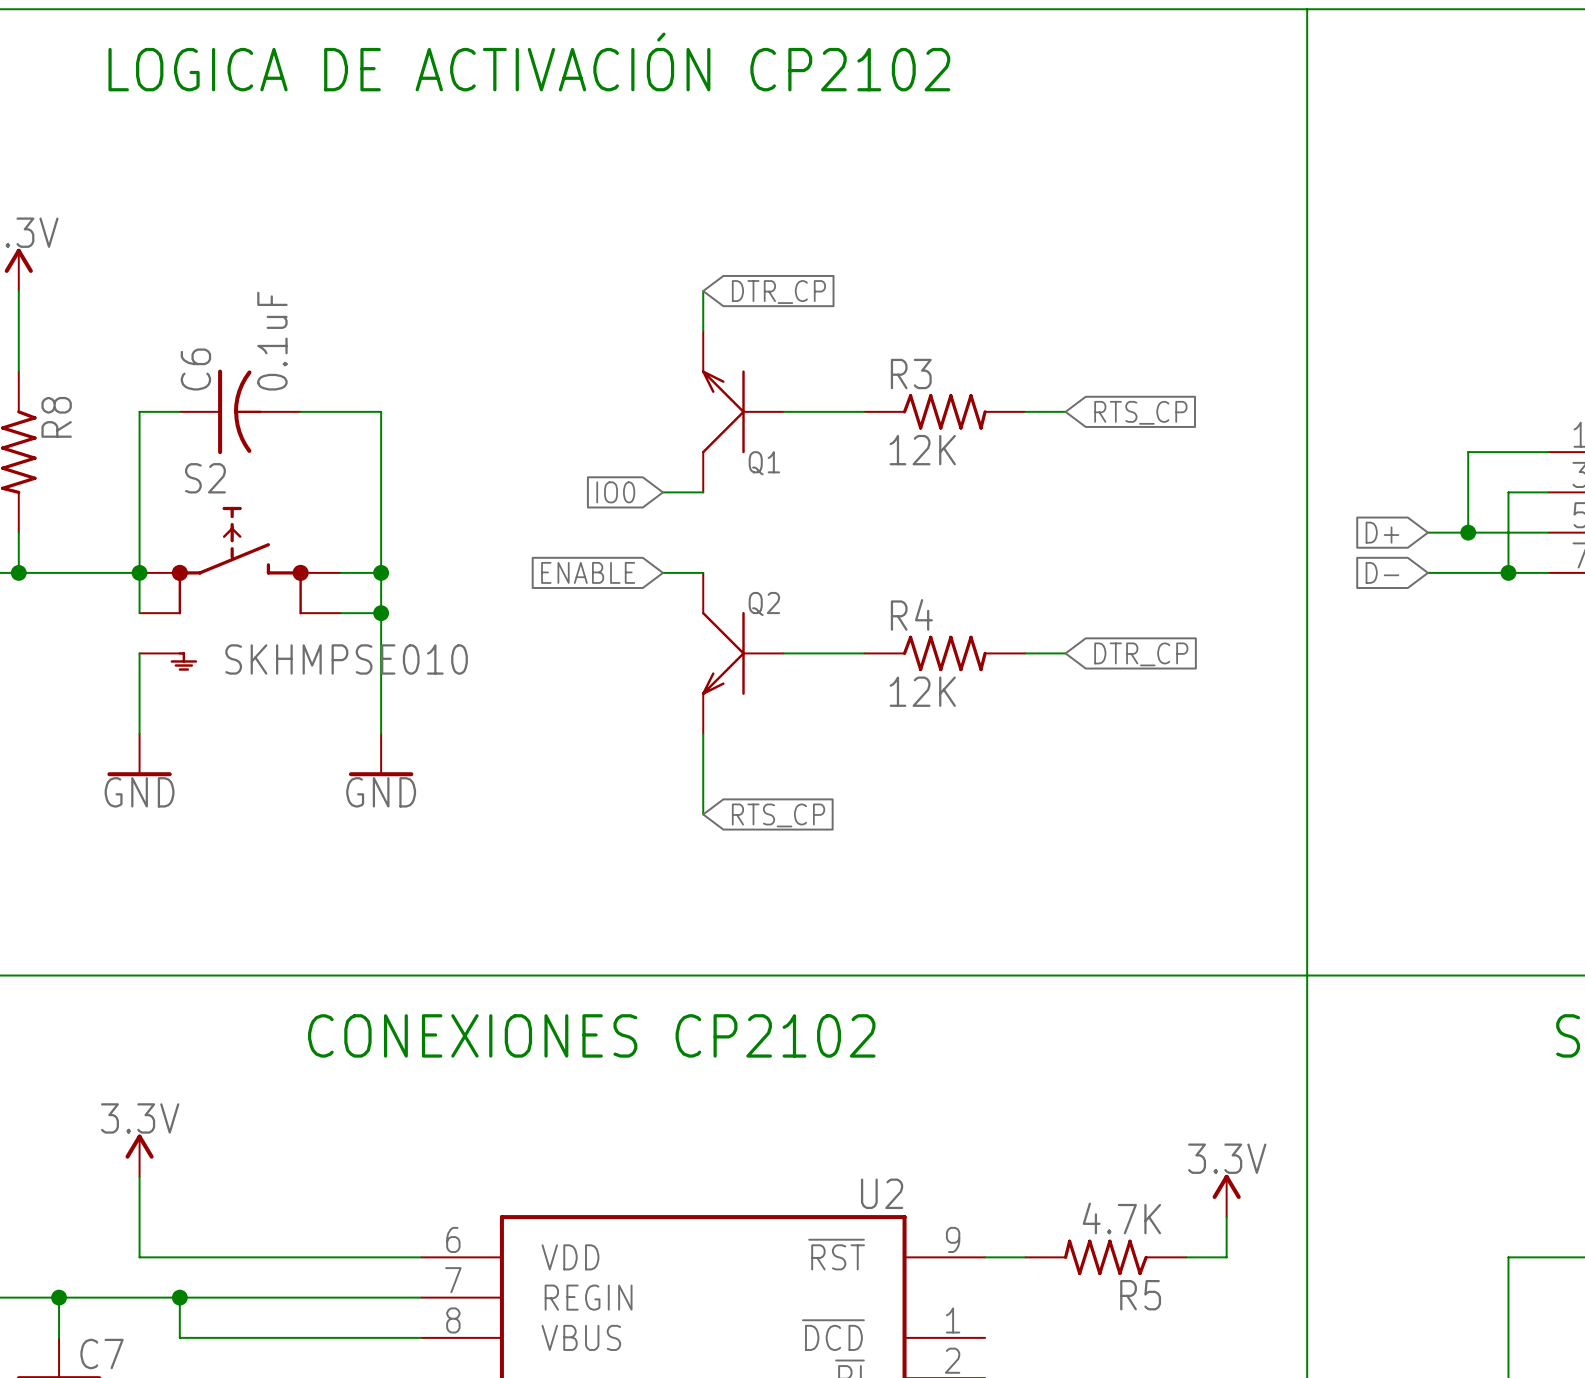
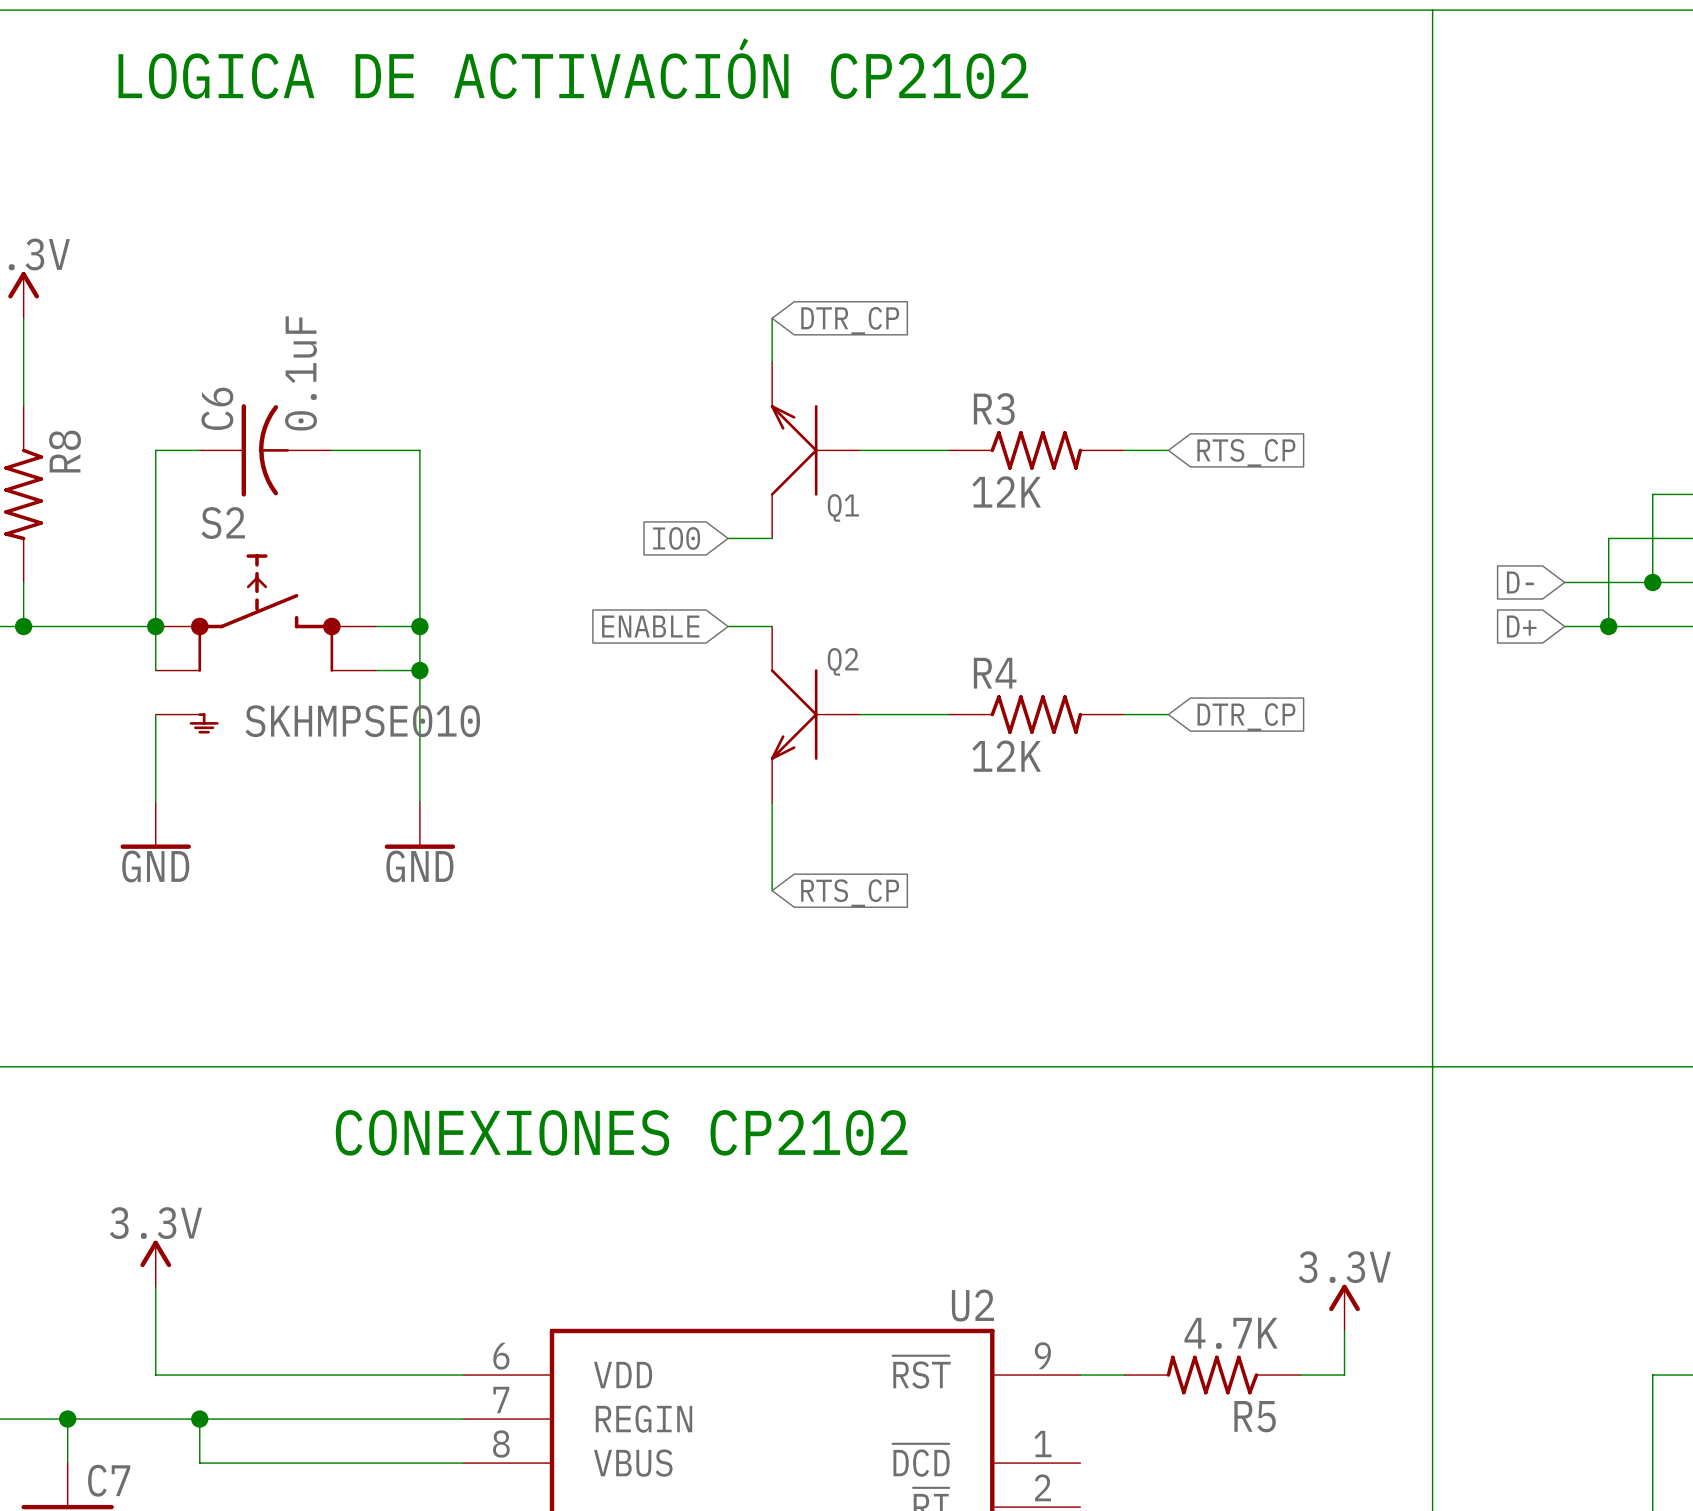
wire: (1508, 452) (1468, 452) (1468, 492) -> (1652, 494) (1652, 538) (1608, 538)
global label: D+ (1382, 532) -> D- (1520, 582)
junction: (1468, 532) -> none
wire: (1508, 532) (1508, 572) -> (1608, 582) (1608, 626)
junction: none -> (1652, 582)
global label: D- (1382, 572) -> D+ (1521, 626)
junction: none -> (1608, 626)
junction: (1508, 572) -> none

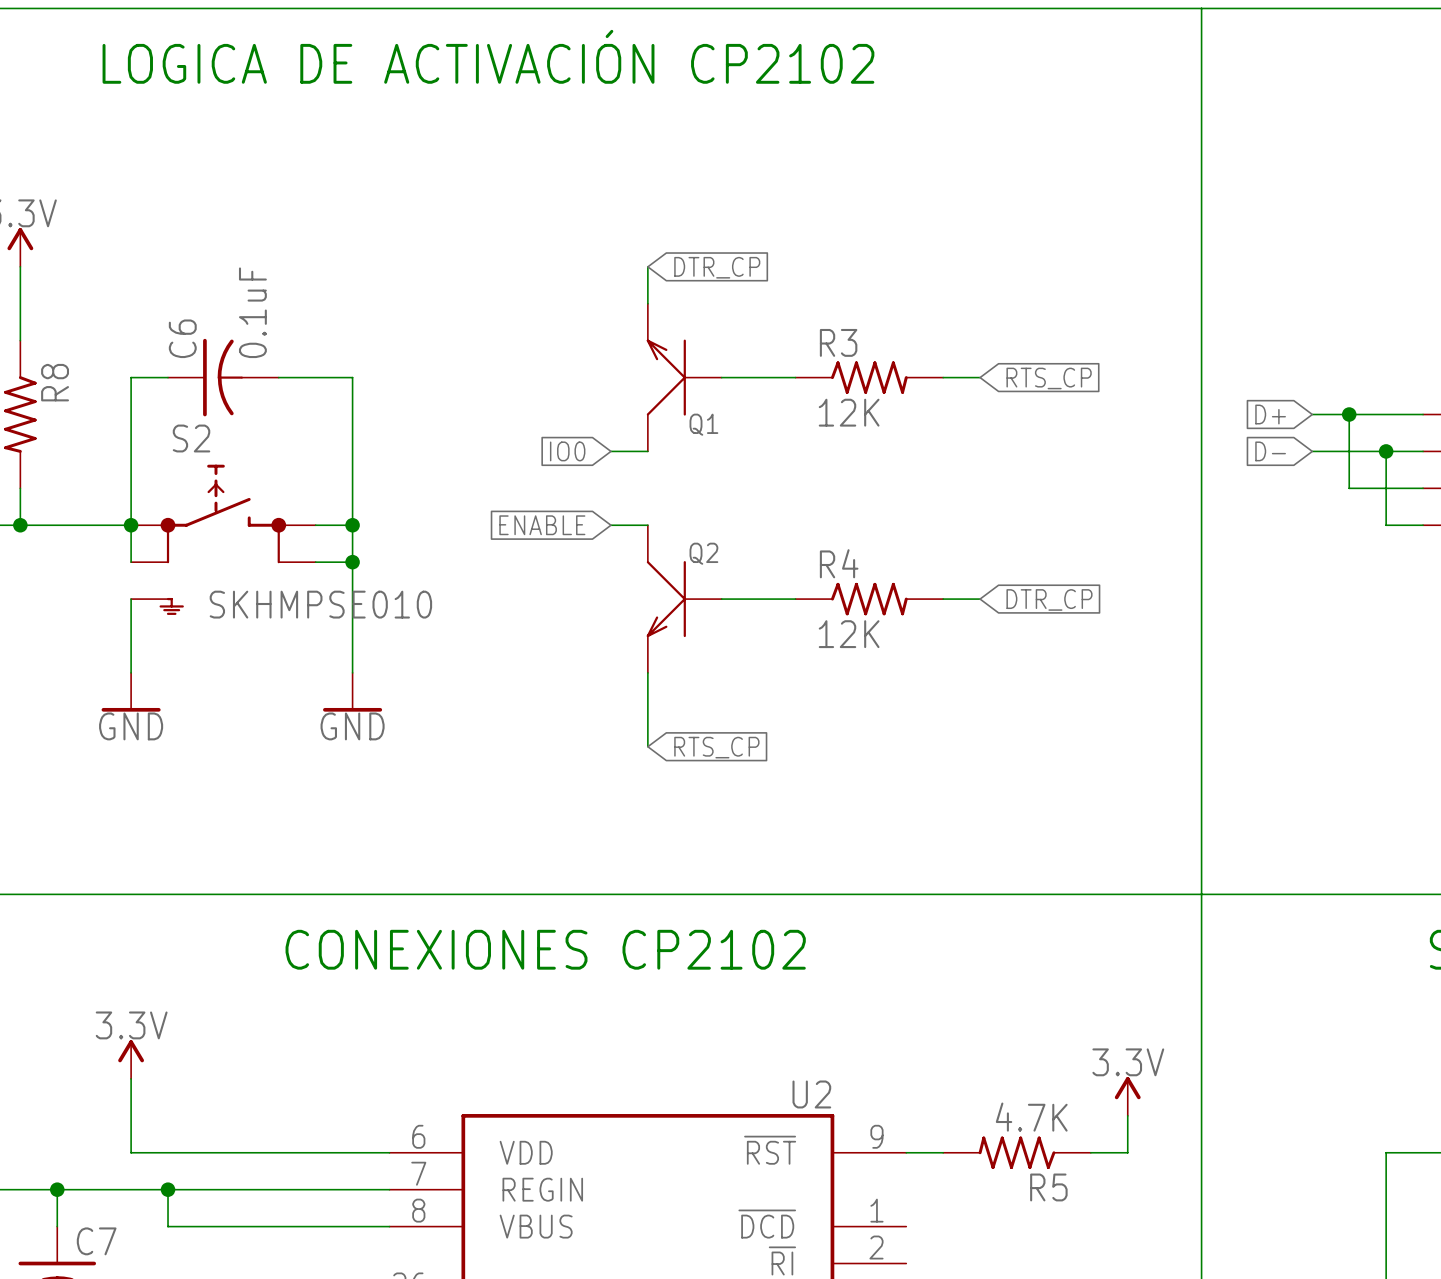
wire: none -> (1349, 414) (1349, 451) (1312, 451)
junction: none -> (1349, 414)
wire: (1652, 494) (1652, 538) -> (1386, 414) (1312, 414)
global label position: D- (1520, 582) -> D- (1270, 451)
wire: (1564, 582) (1608, 582) (1608, 626) -> none
junction position: (1652, 582) -> (1386, 451)
global label position: D+ (1521, 626) -> D+ (1270, 414)
wire: (1564, 626) (1652, 626) -> (1386, 488) (1386, 525)
junction: (1608, 626) -> none

